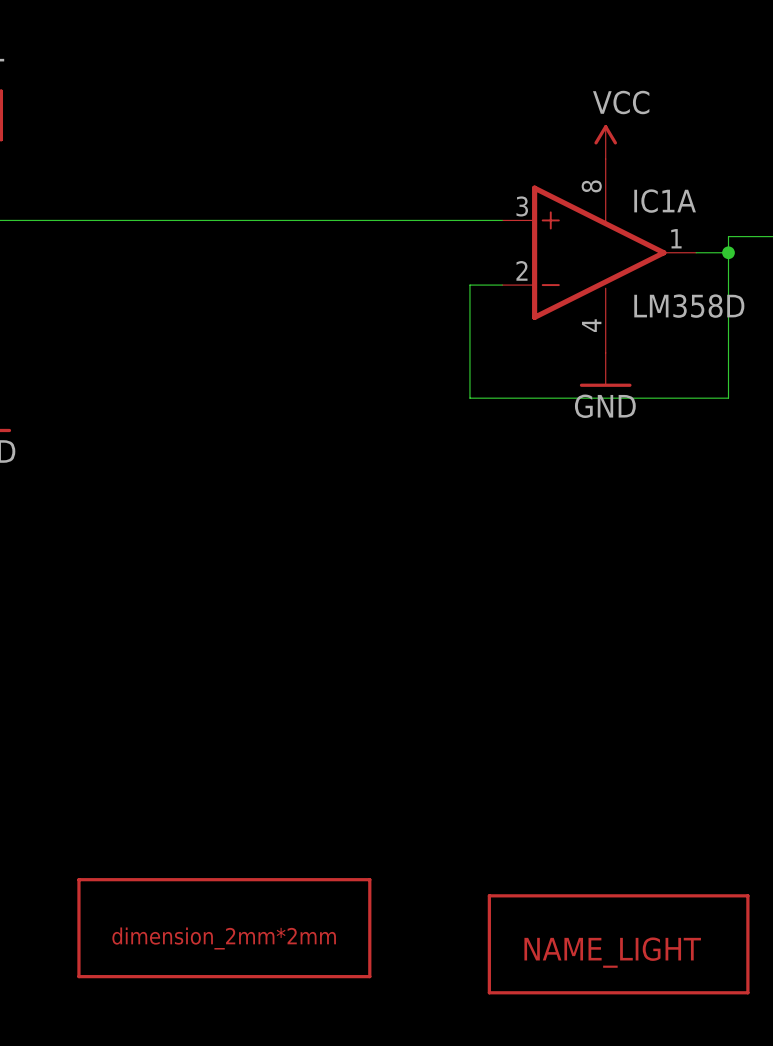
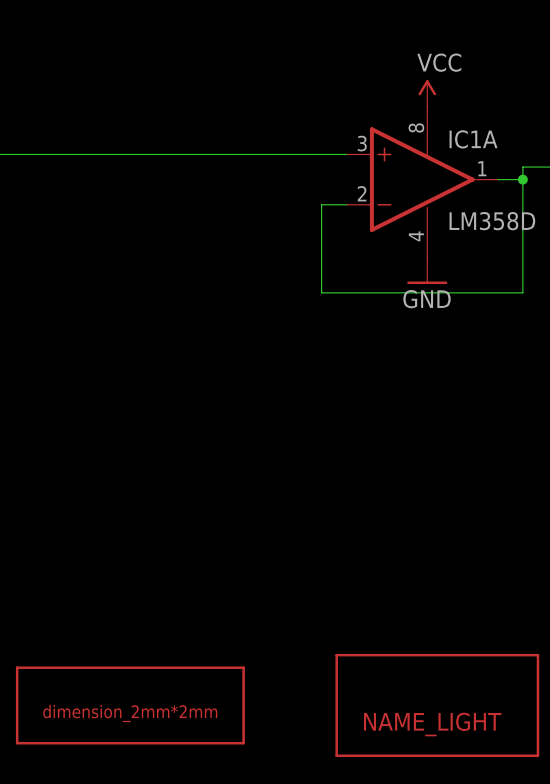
part: none -> (437, 705)
part: (618, 944) -> none

